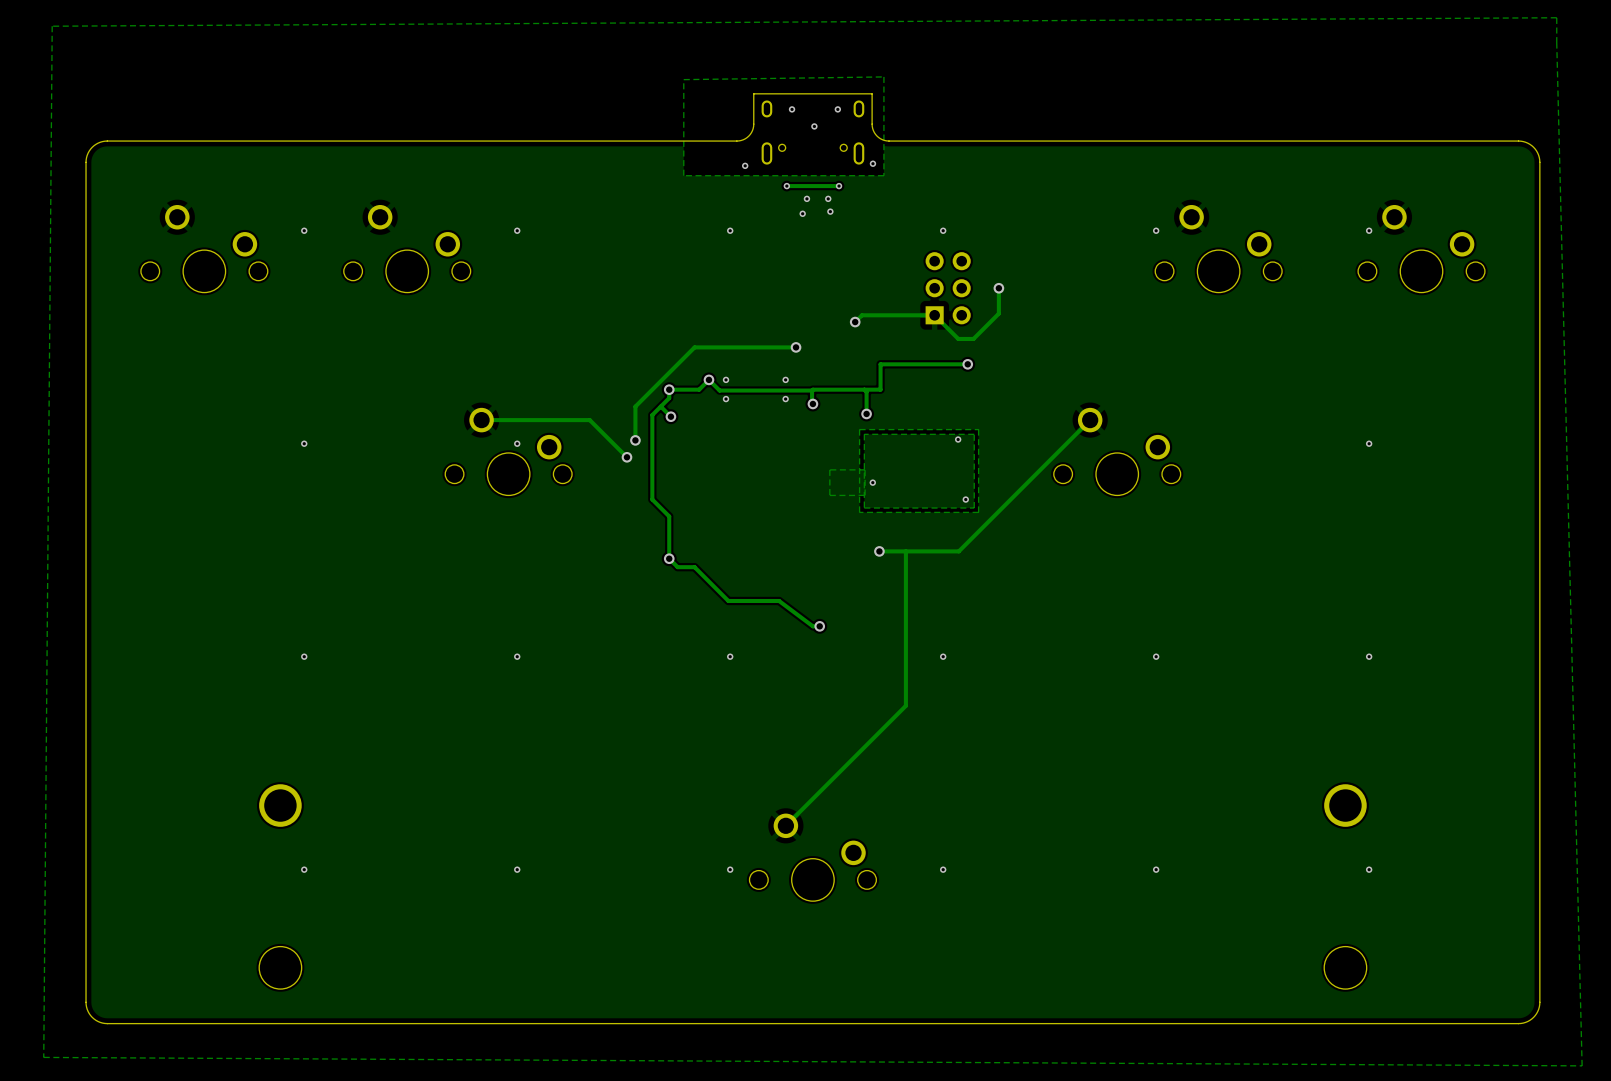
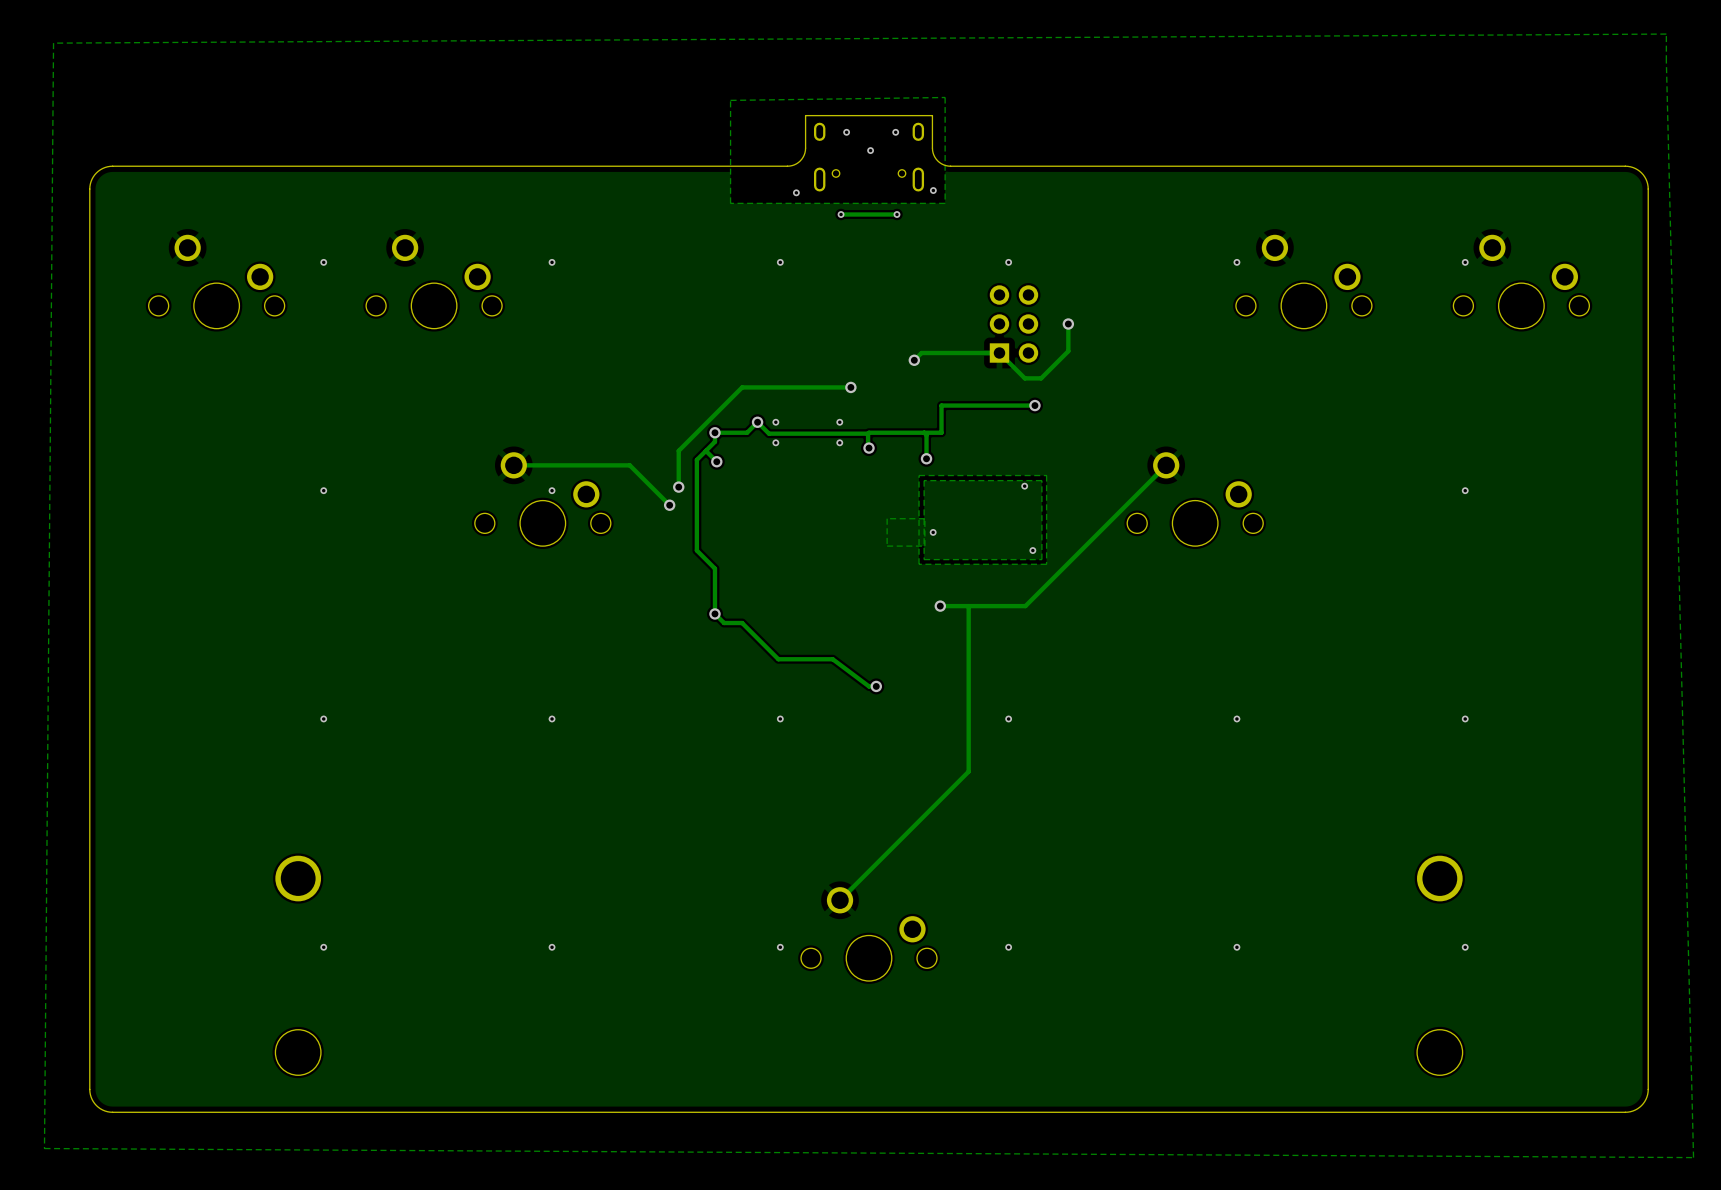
via: (806, 198) -> none
via: (828, 198) -> none
via: (830, 211) -> none
via: (802, 213) -> none

